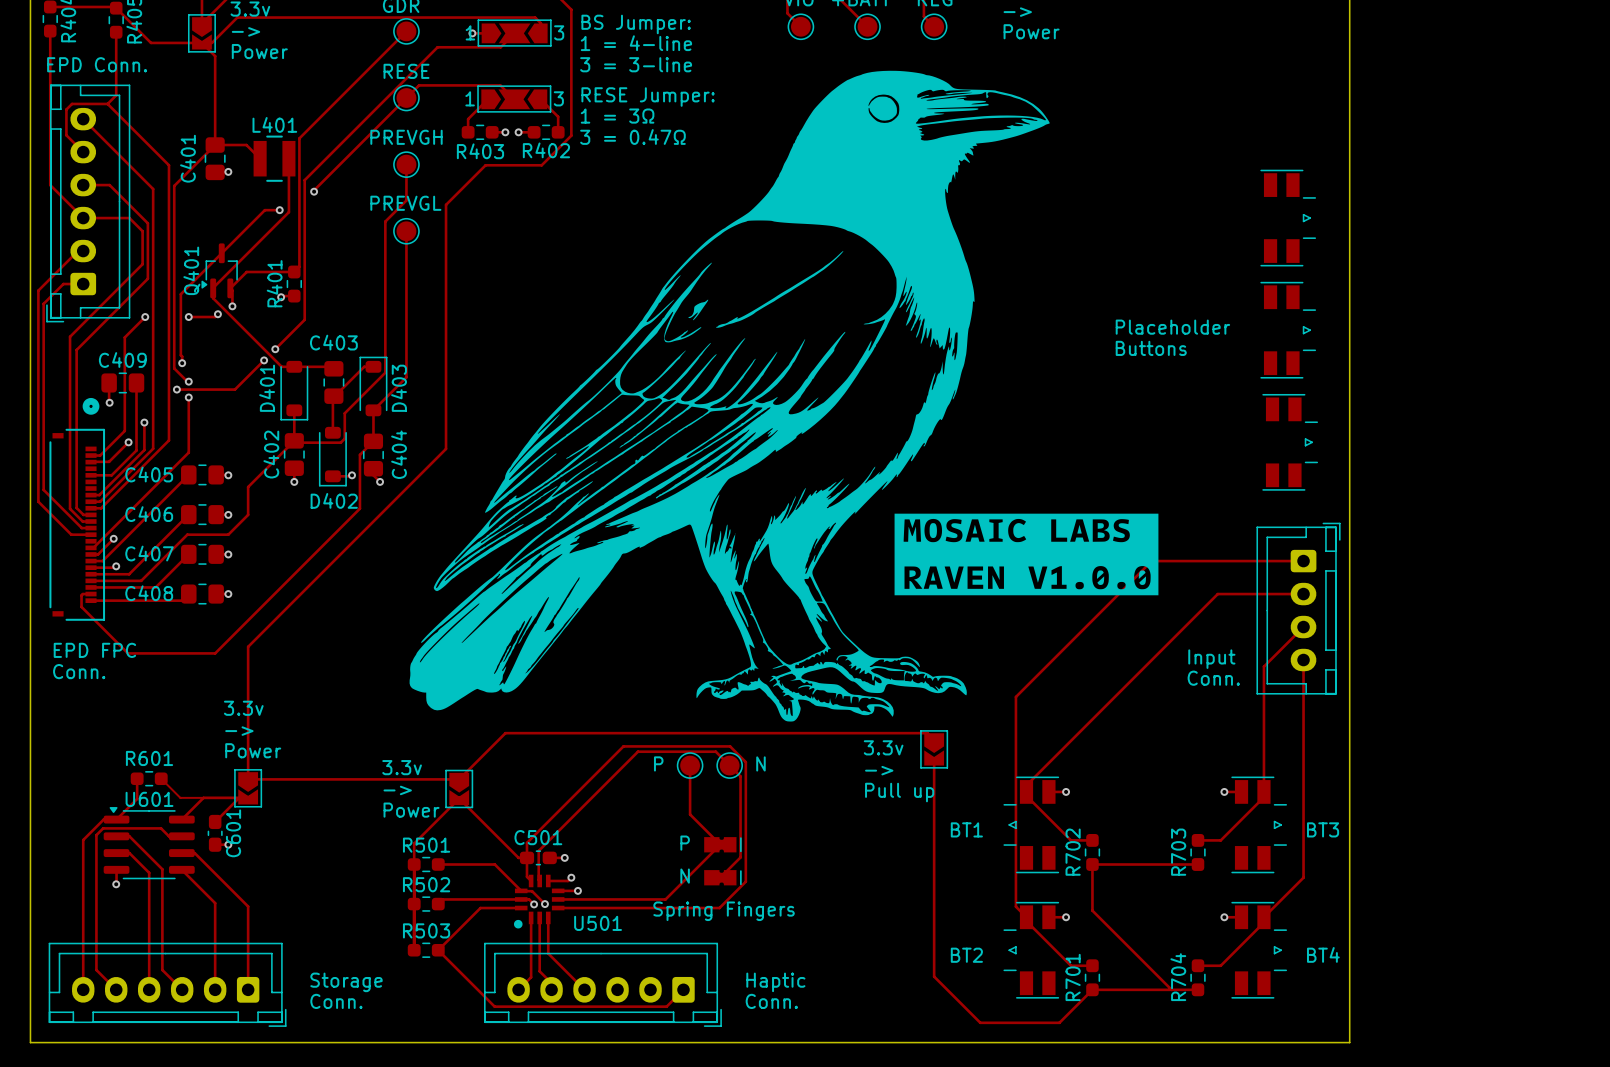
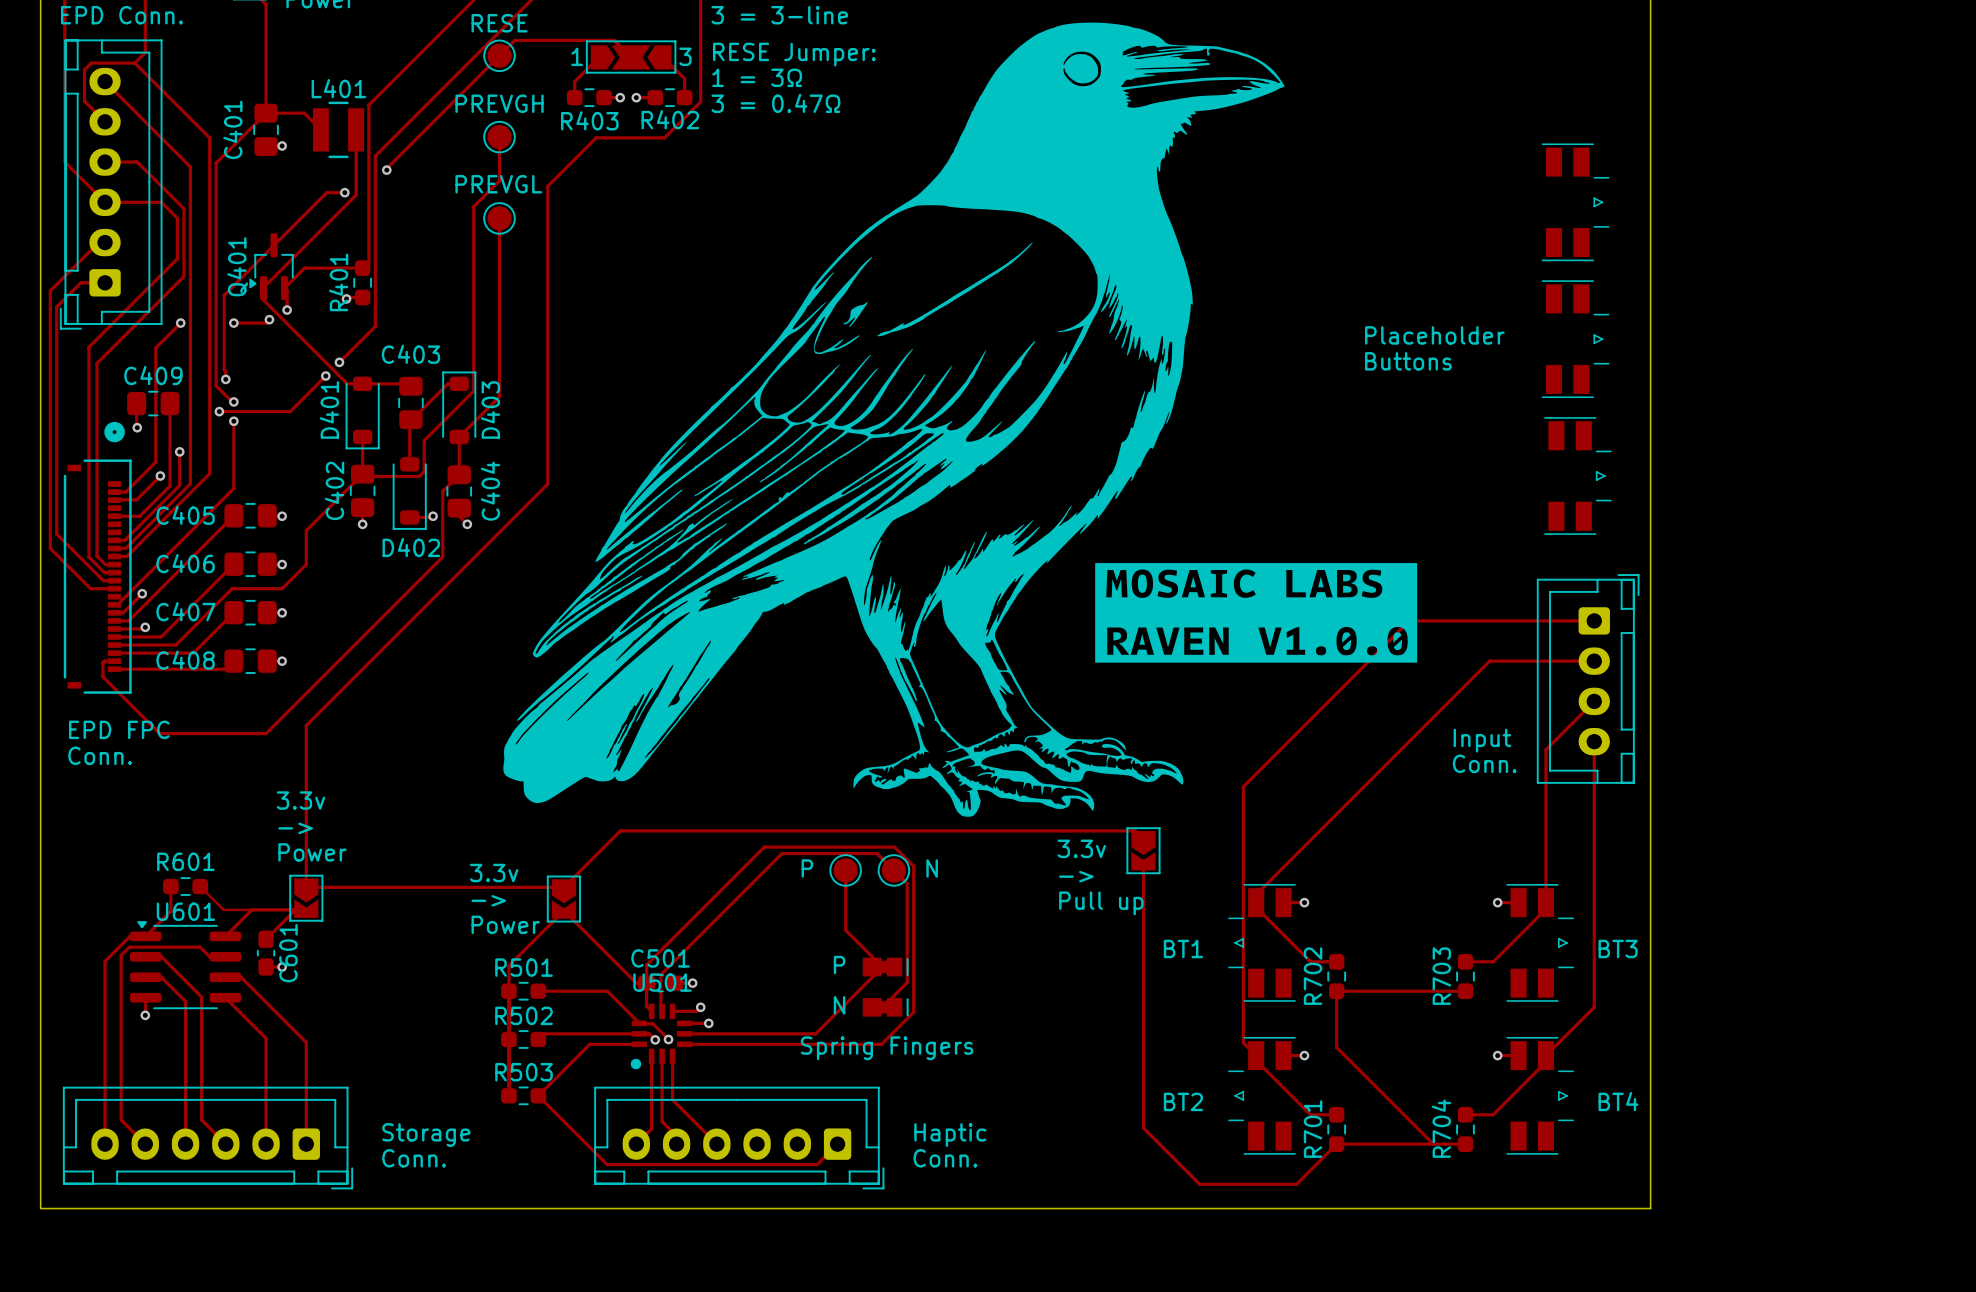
U501 name position: U501 (598, 923) -> U501 (662, 982)

